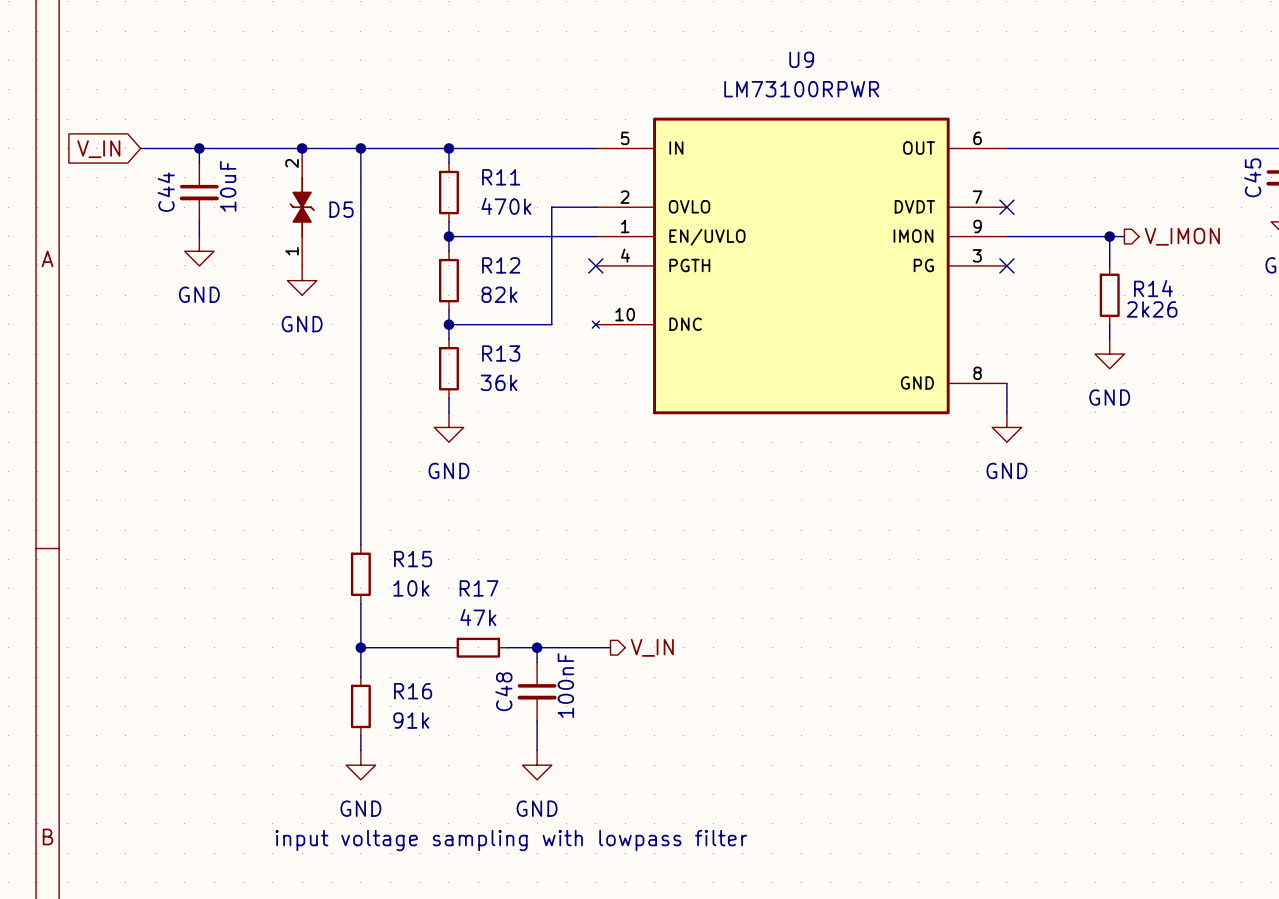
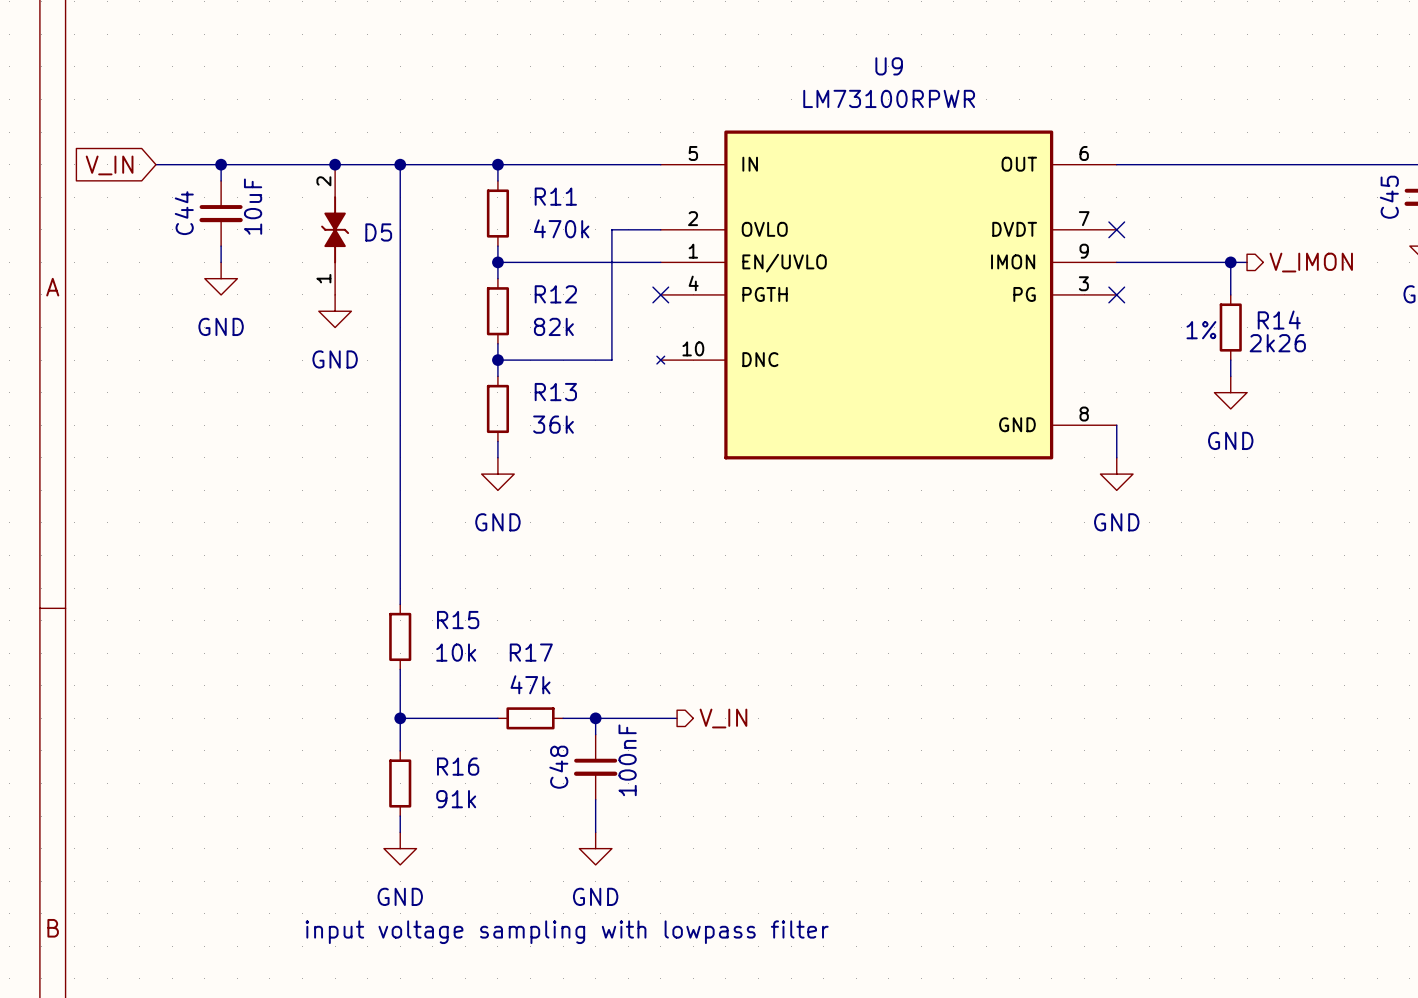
R14 text: none -> 1% (1201, 330)

